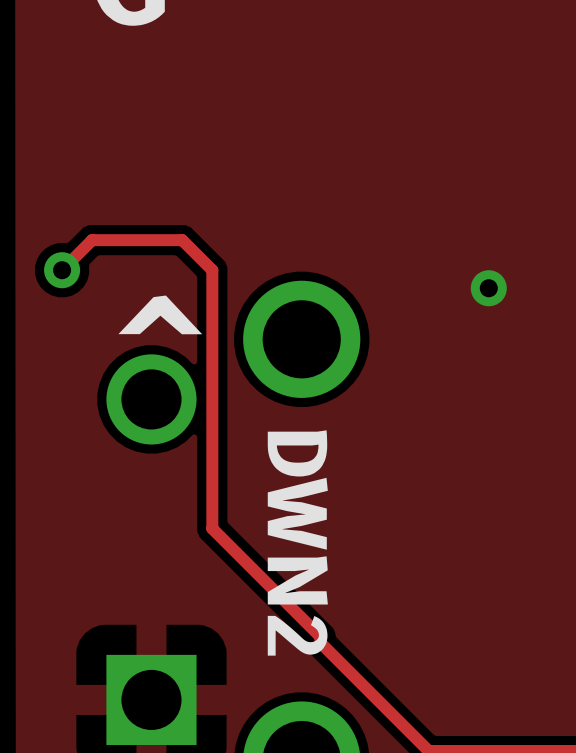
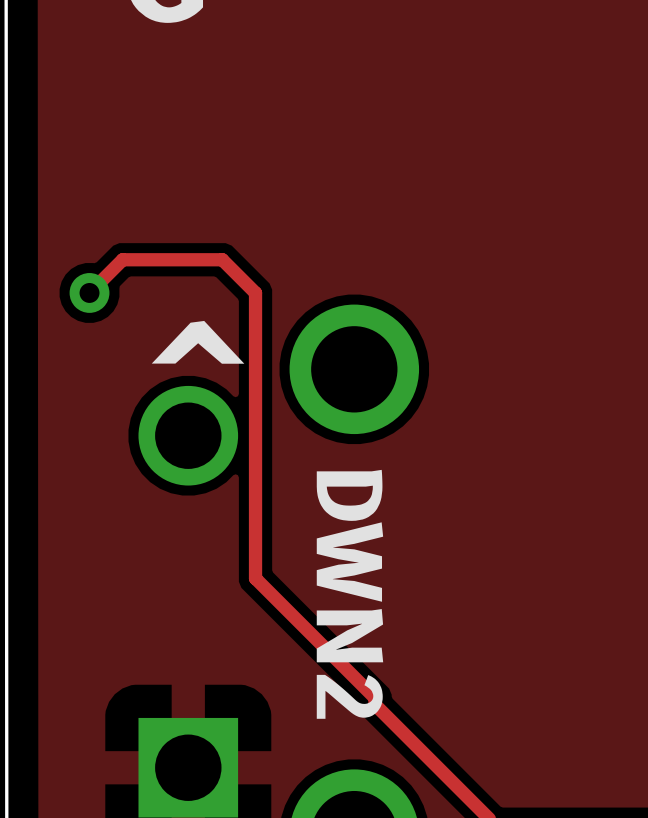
via: (488, 288) -> none

